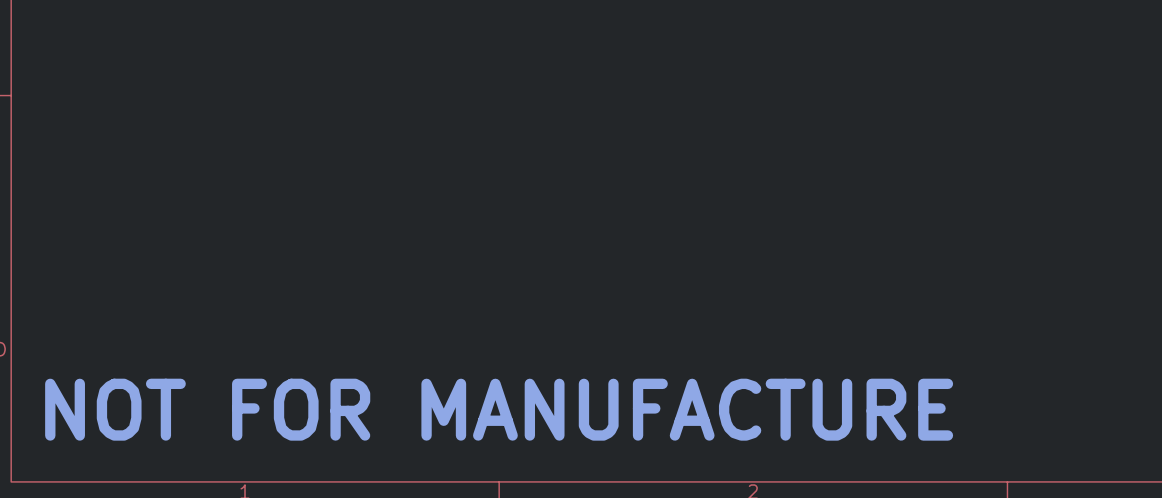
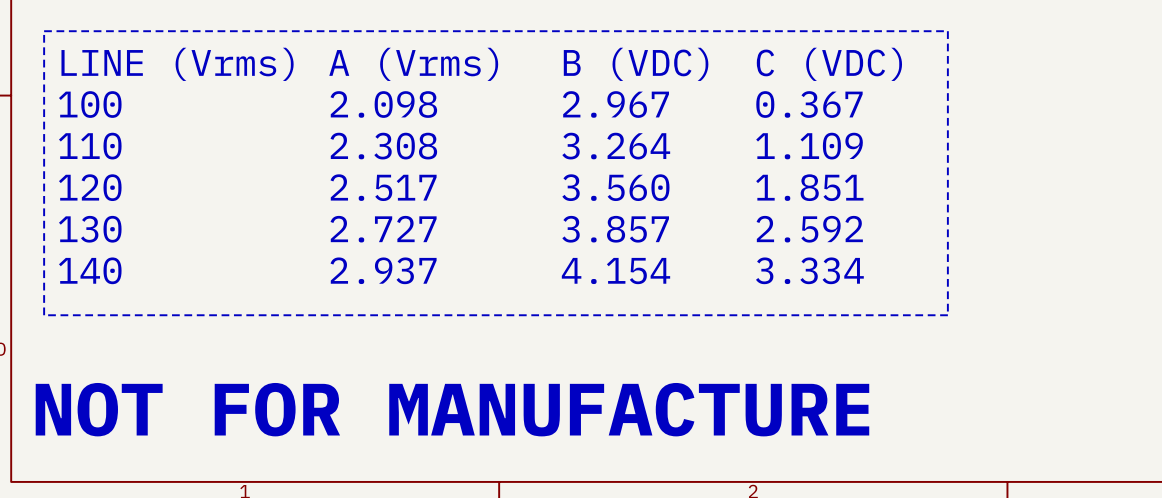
line: none -> (44, 31) (44, 315) (947, 315) (947, 31) (44, 31)
text: none -> LINE (Vrms) (177, 64)
text: none -> A (Vrms) (413, 64)
text: none -> B (VDC) (636, 64)
text: none -> C (VDC) (829, 64)
text: none -> 100 (90, 104)
text: none -> 2.098 (383, 104)
text: none -> 2.967 (615, 104)
text: none -> 0.367 (809, 104)
text: none -> 3.264 (616, 146)
text: none -> 110 (90, 146)
text: none -> 2.308 (383, 146)
text: none -> 1.109 (809, 146)
text: none -> 120 (90, 187)
text: none -> 2.517 (383, 187)
text: none -> 3.560 (615, 187)
text: none -> 1.851 (809, 187)
text: none -> 130 (90, 229)
text: none -> 2.727 (383, 229)
text: none -> 3.857 (615, 229)
text: none -> 2.592 (809, 229)
text: none -> 140 (90, 270)
text: none -> 2.937 (383, 270)
text: none -> 4.154 (615, 271)
text: none -> 3.334 (809, 270)

